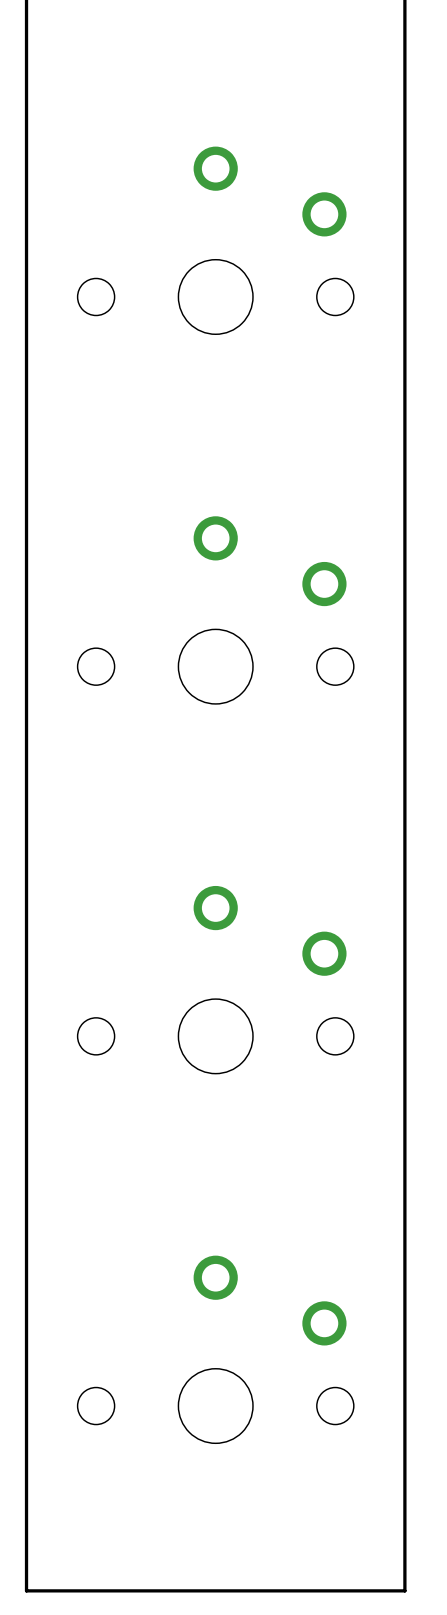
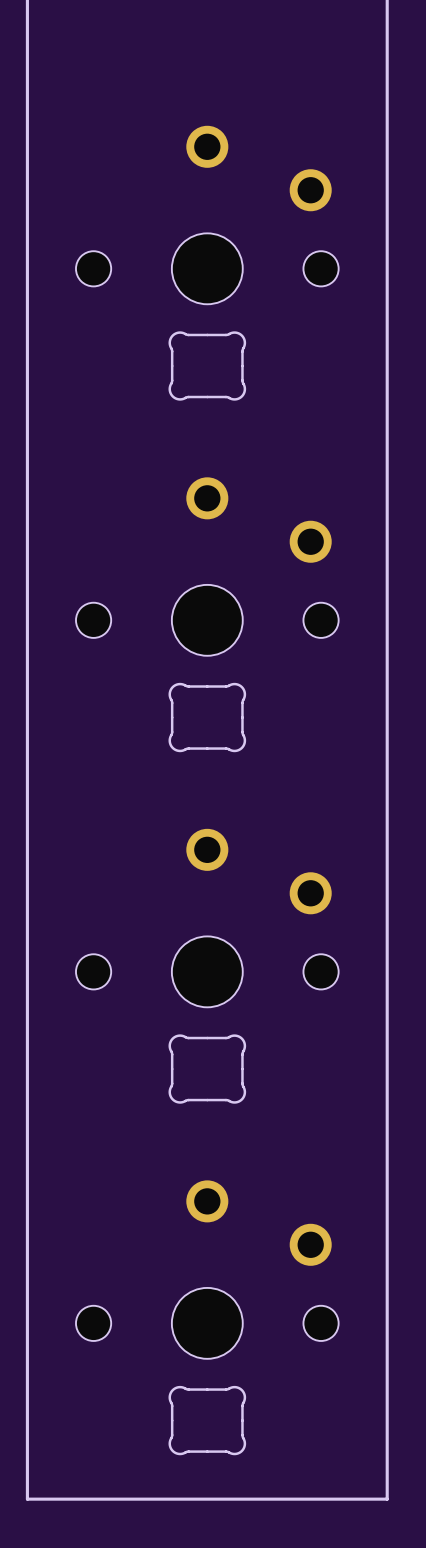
part: none -> (207, 365)
part: none -> (207, 717)
part: none -> (207, 1069)
part: none -> (207, 1420)

